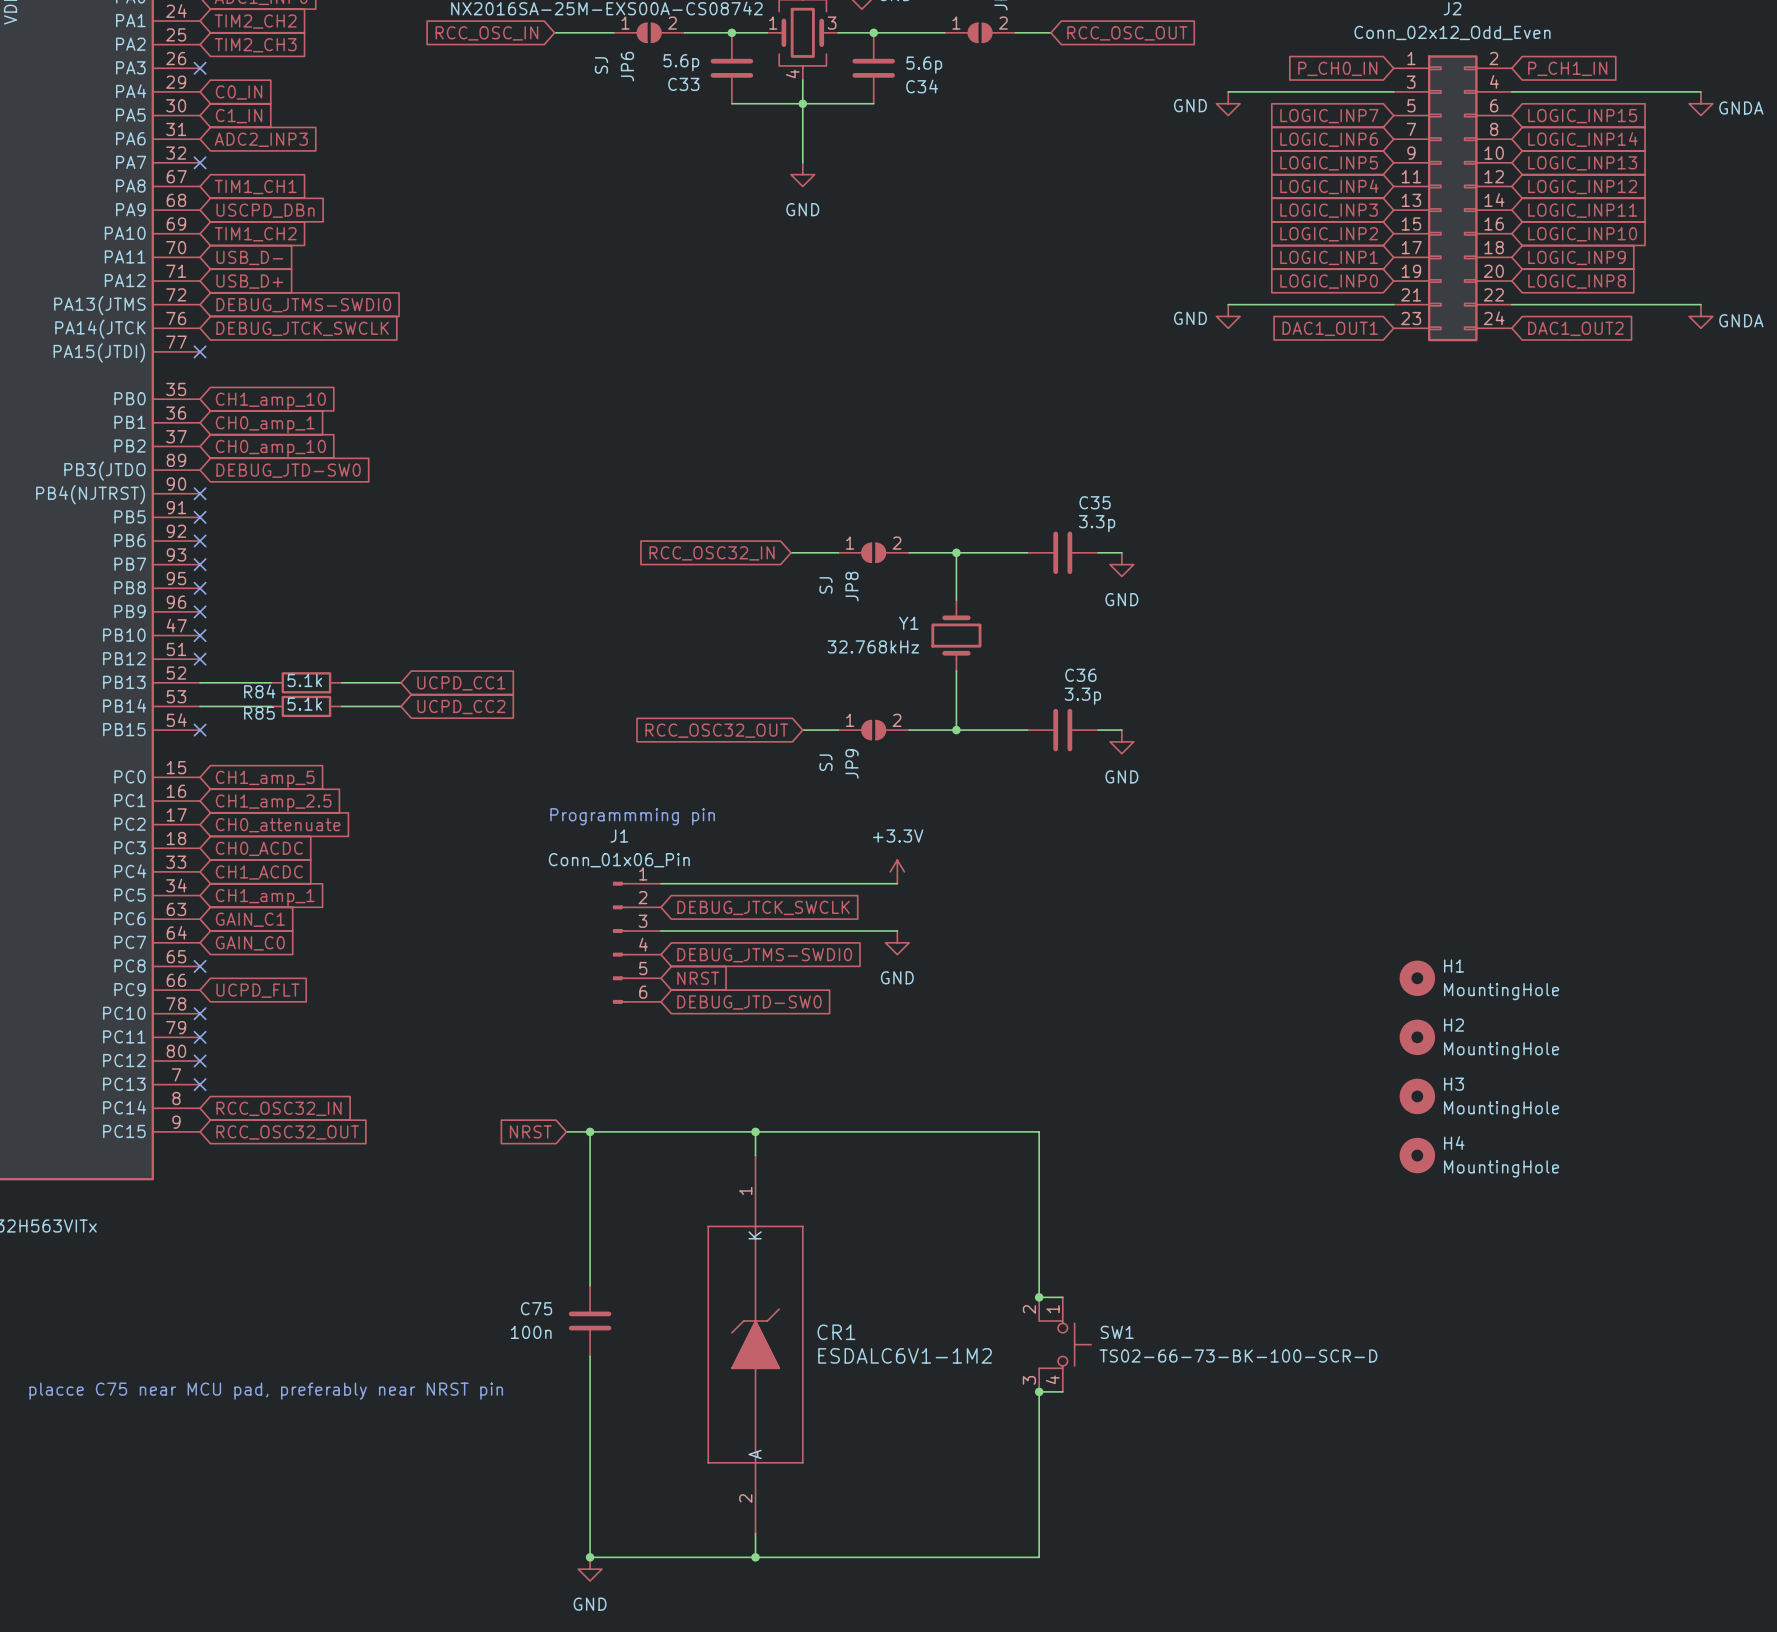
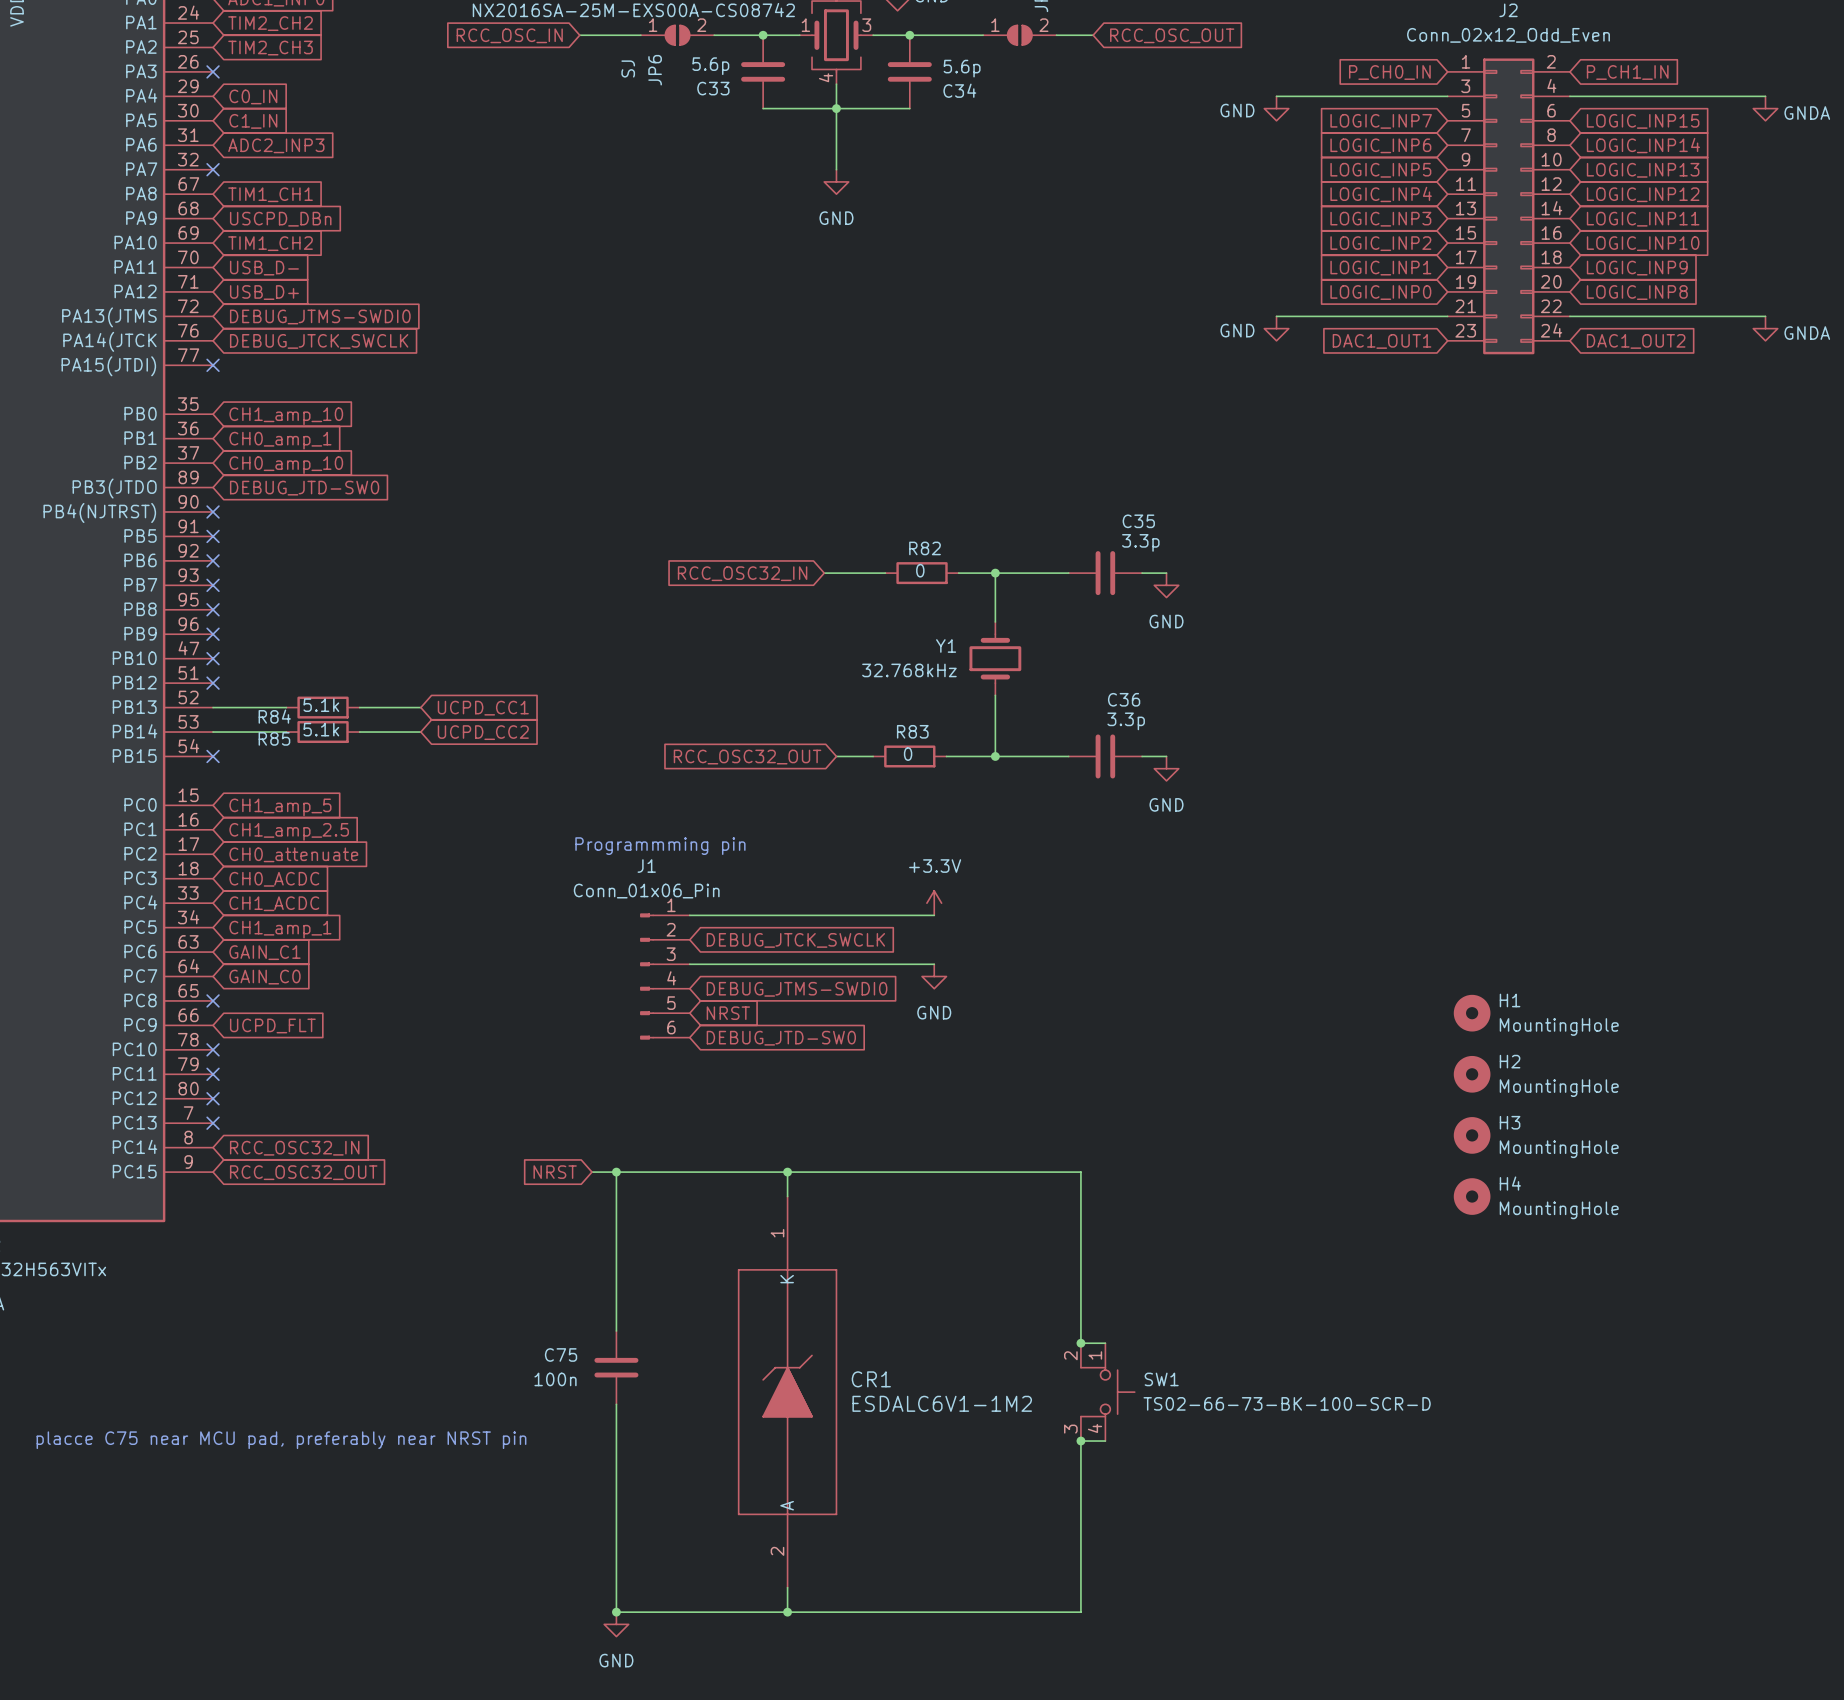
JP8: SJ (873, 552) -> none
R82: none -> 0 (922, 573)
JP9: SJ (873, 730) -> none
R83: none -> 0 (909, 756)

